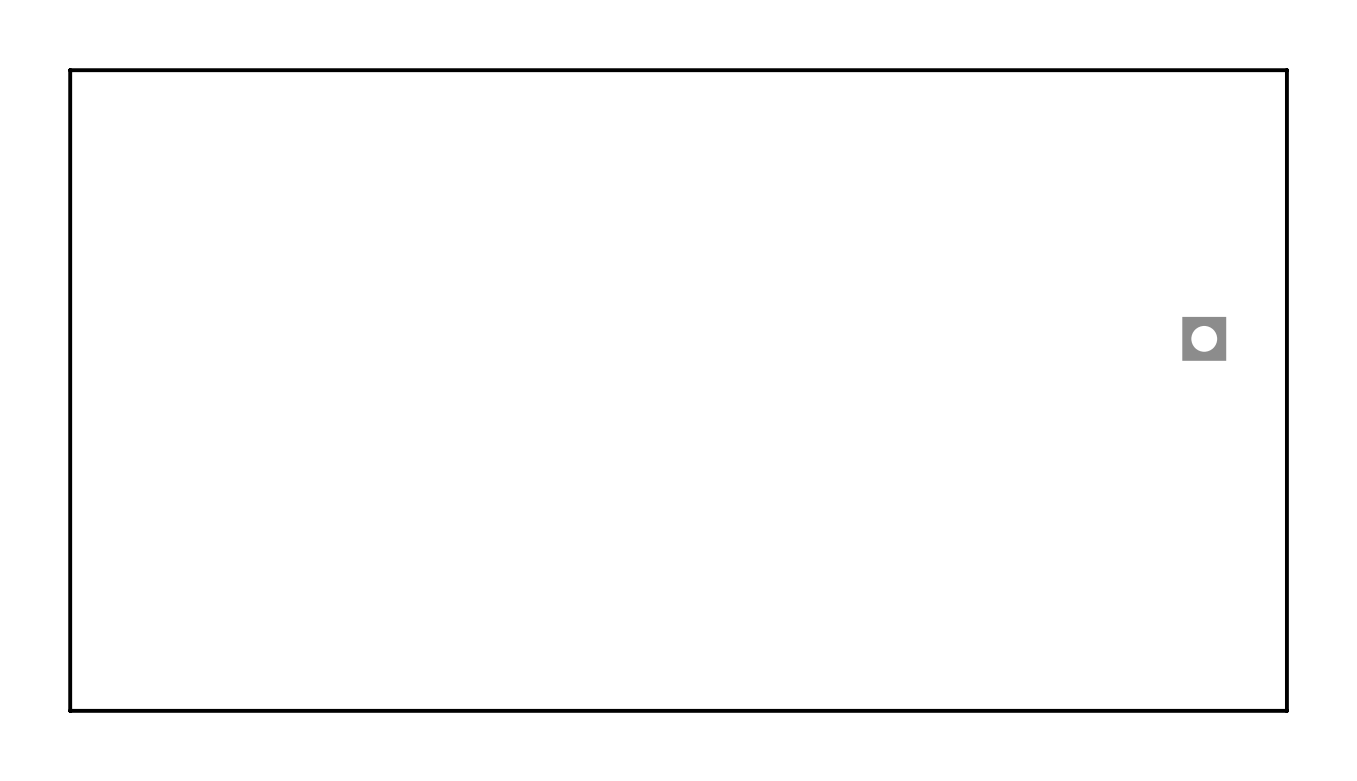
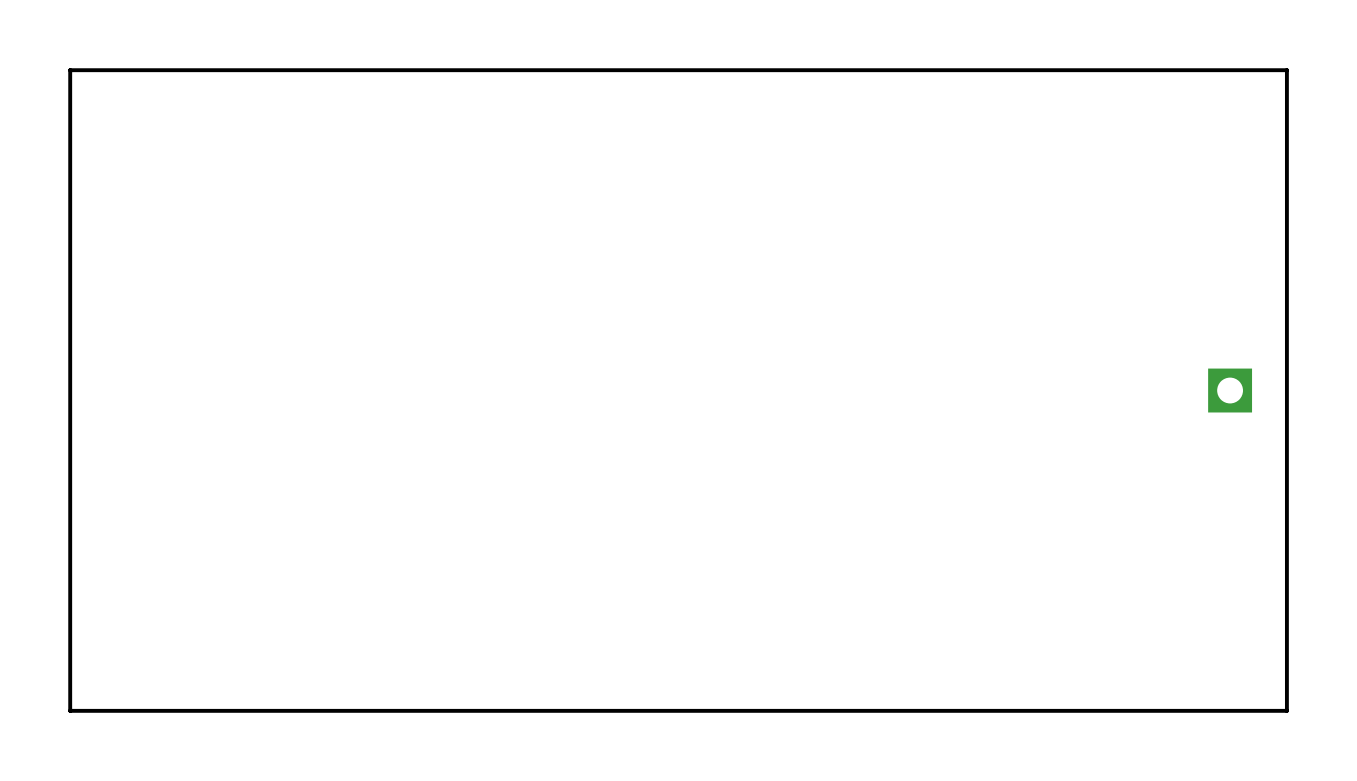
part position: (1204, 338) -> (1230, 390)

